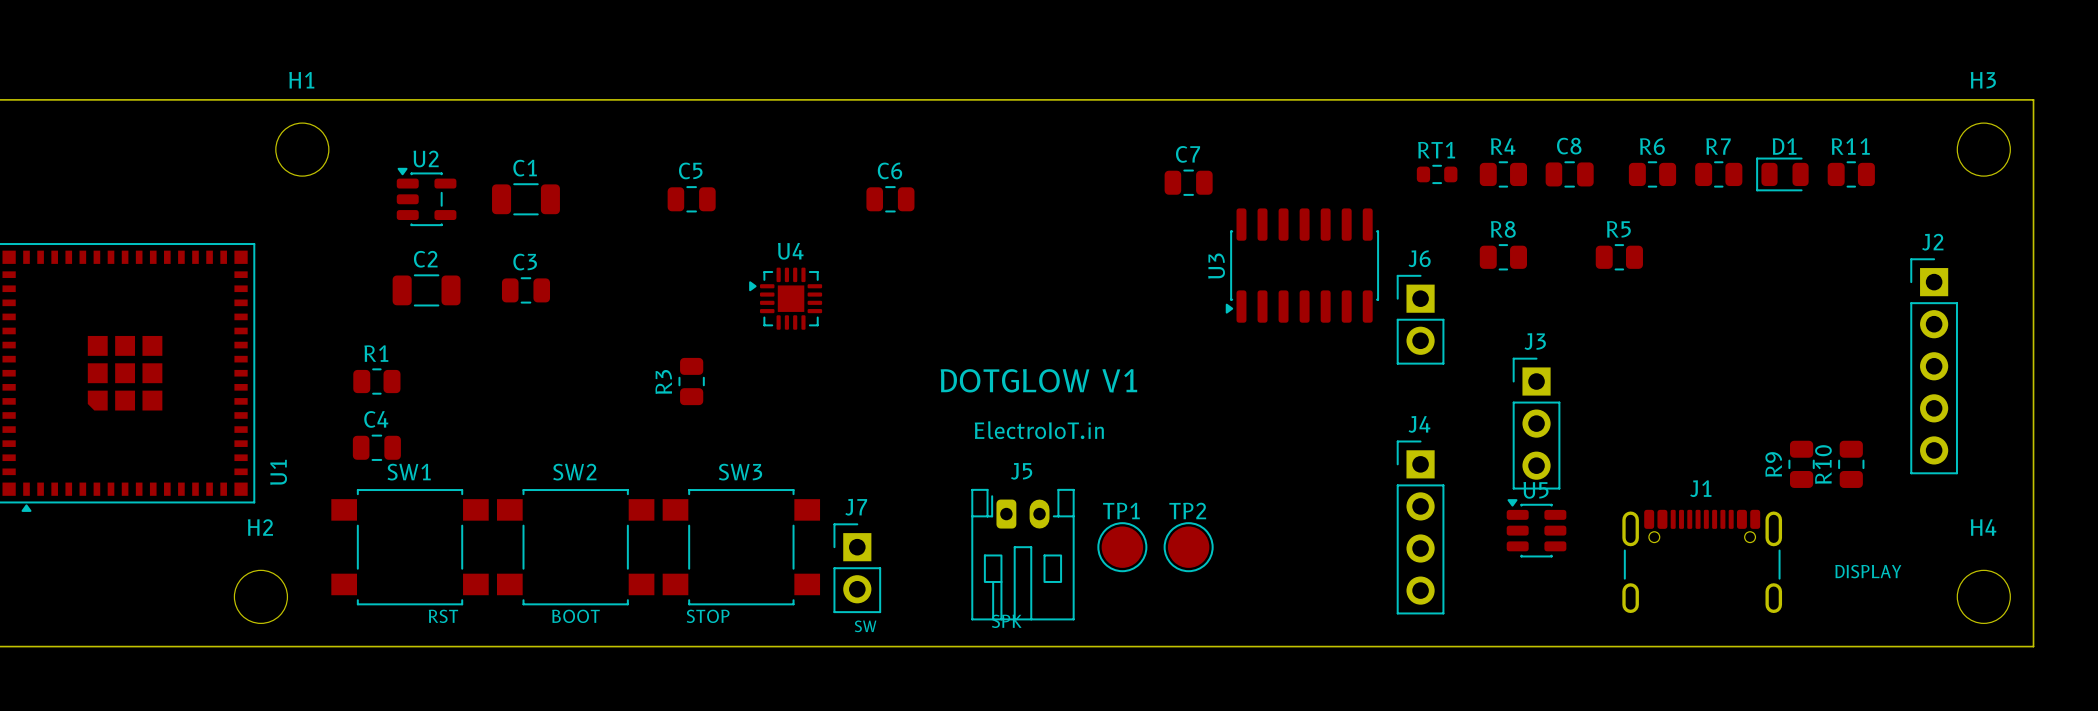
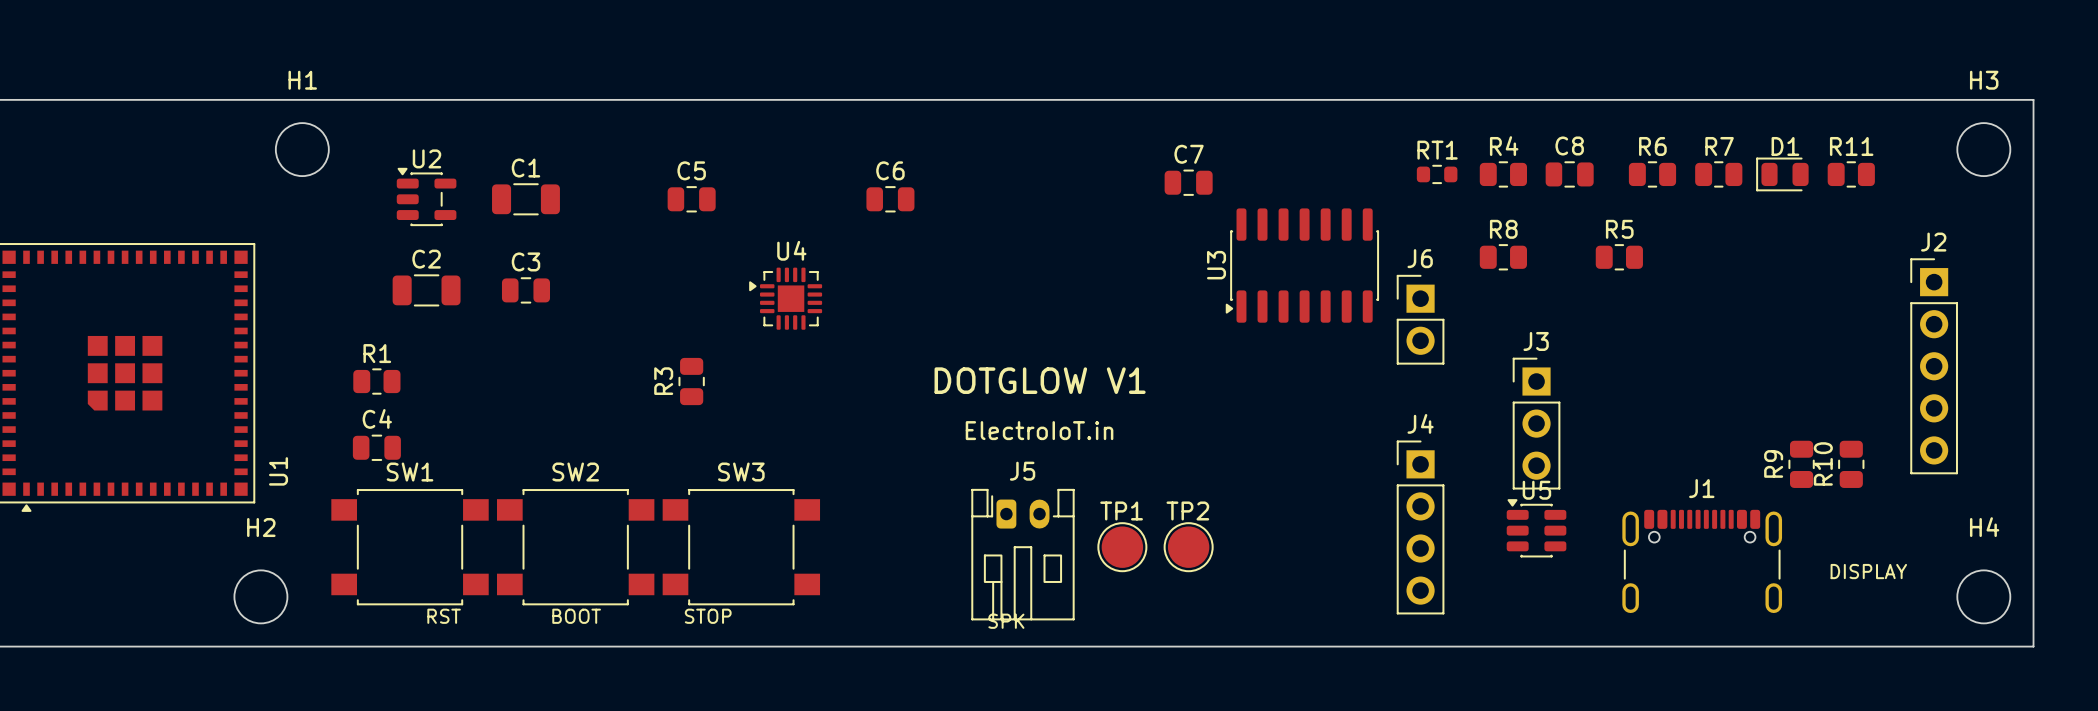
J7: (857, 568) -> none
text: SW (865, 626) -> none

